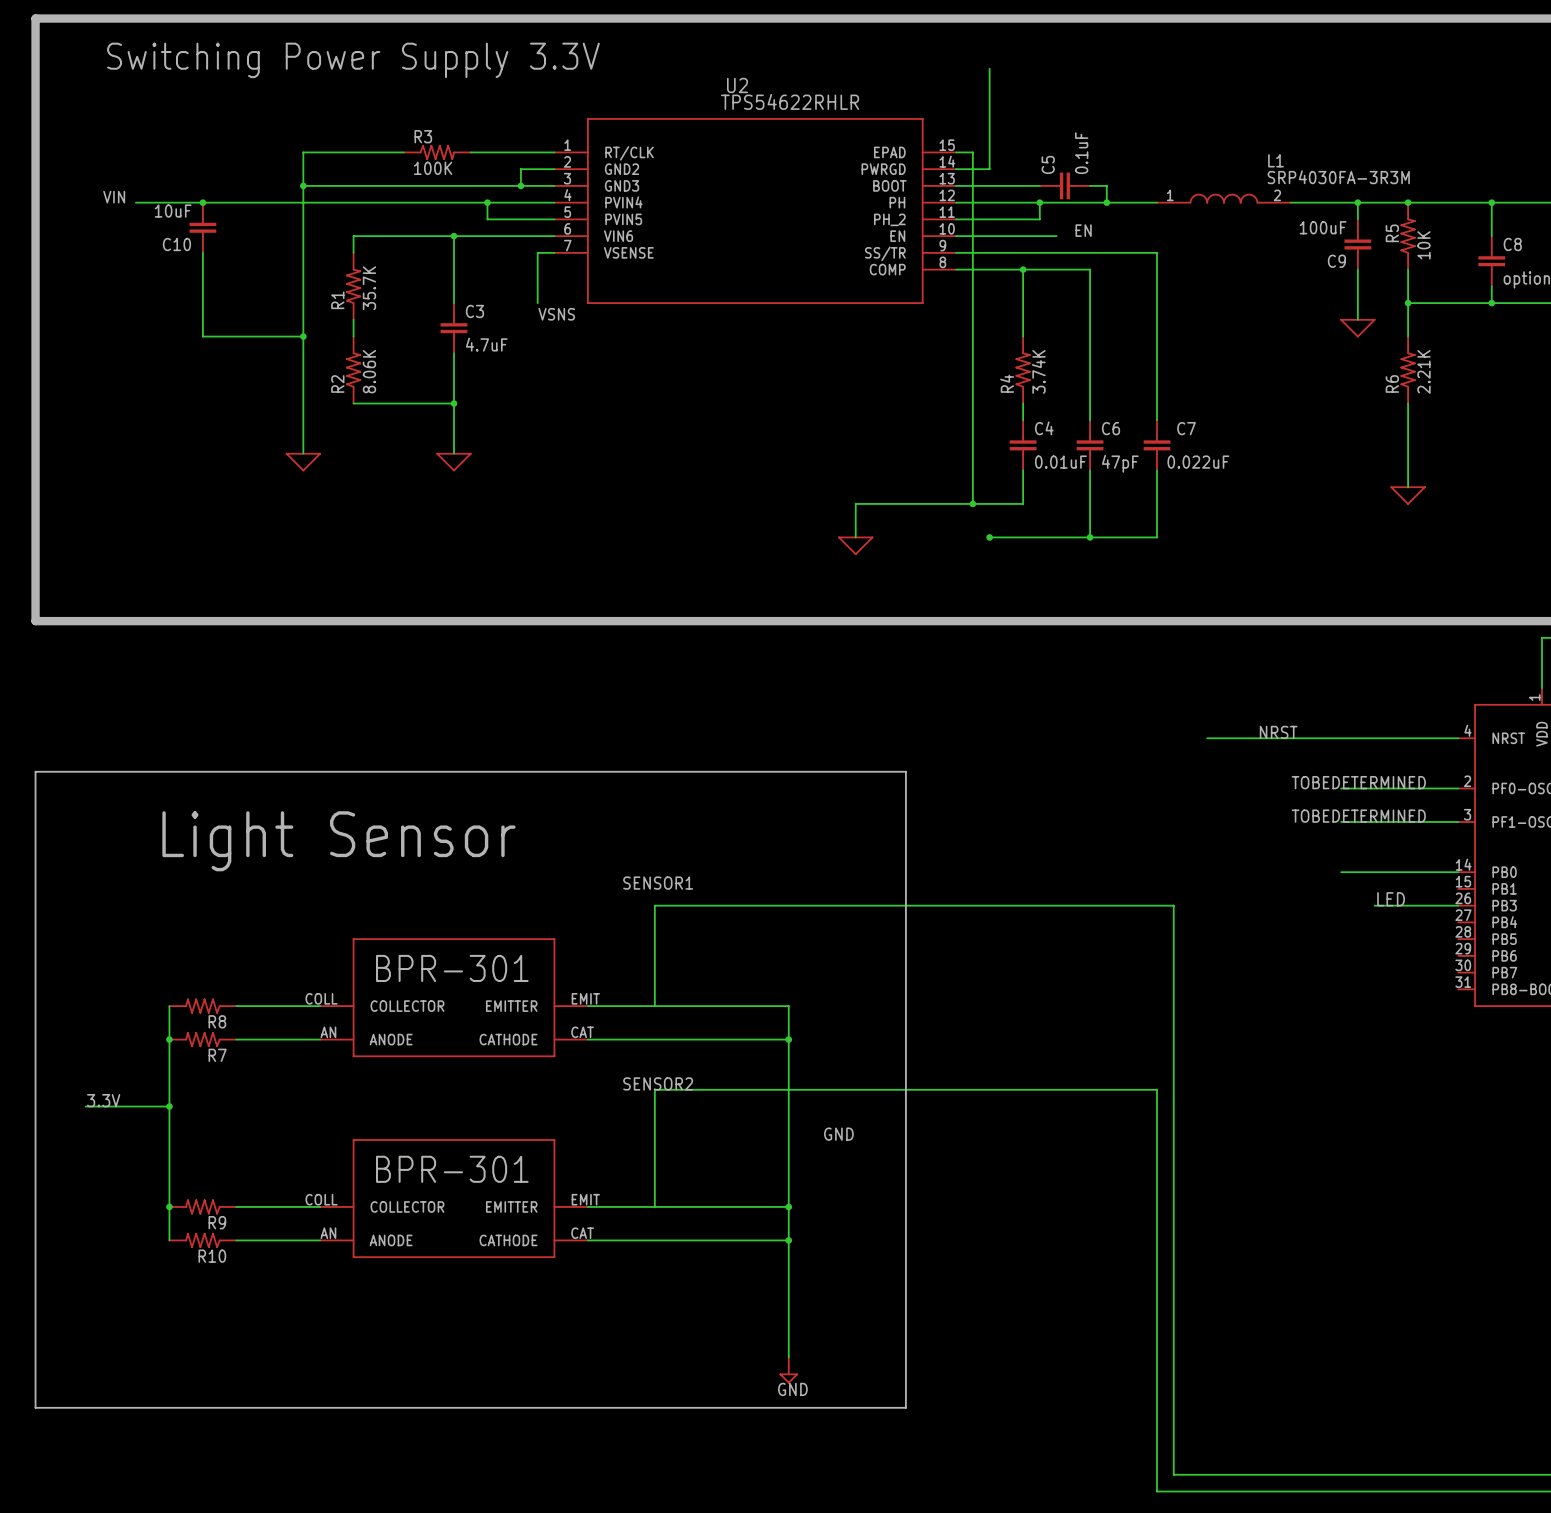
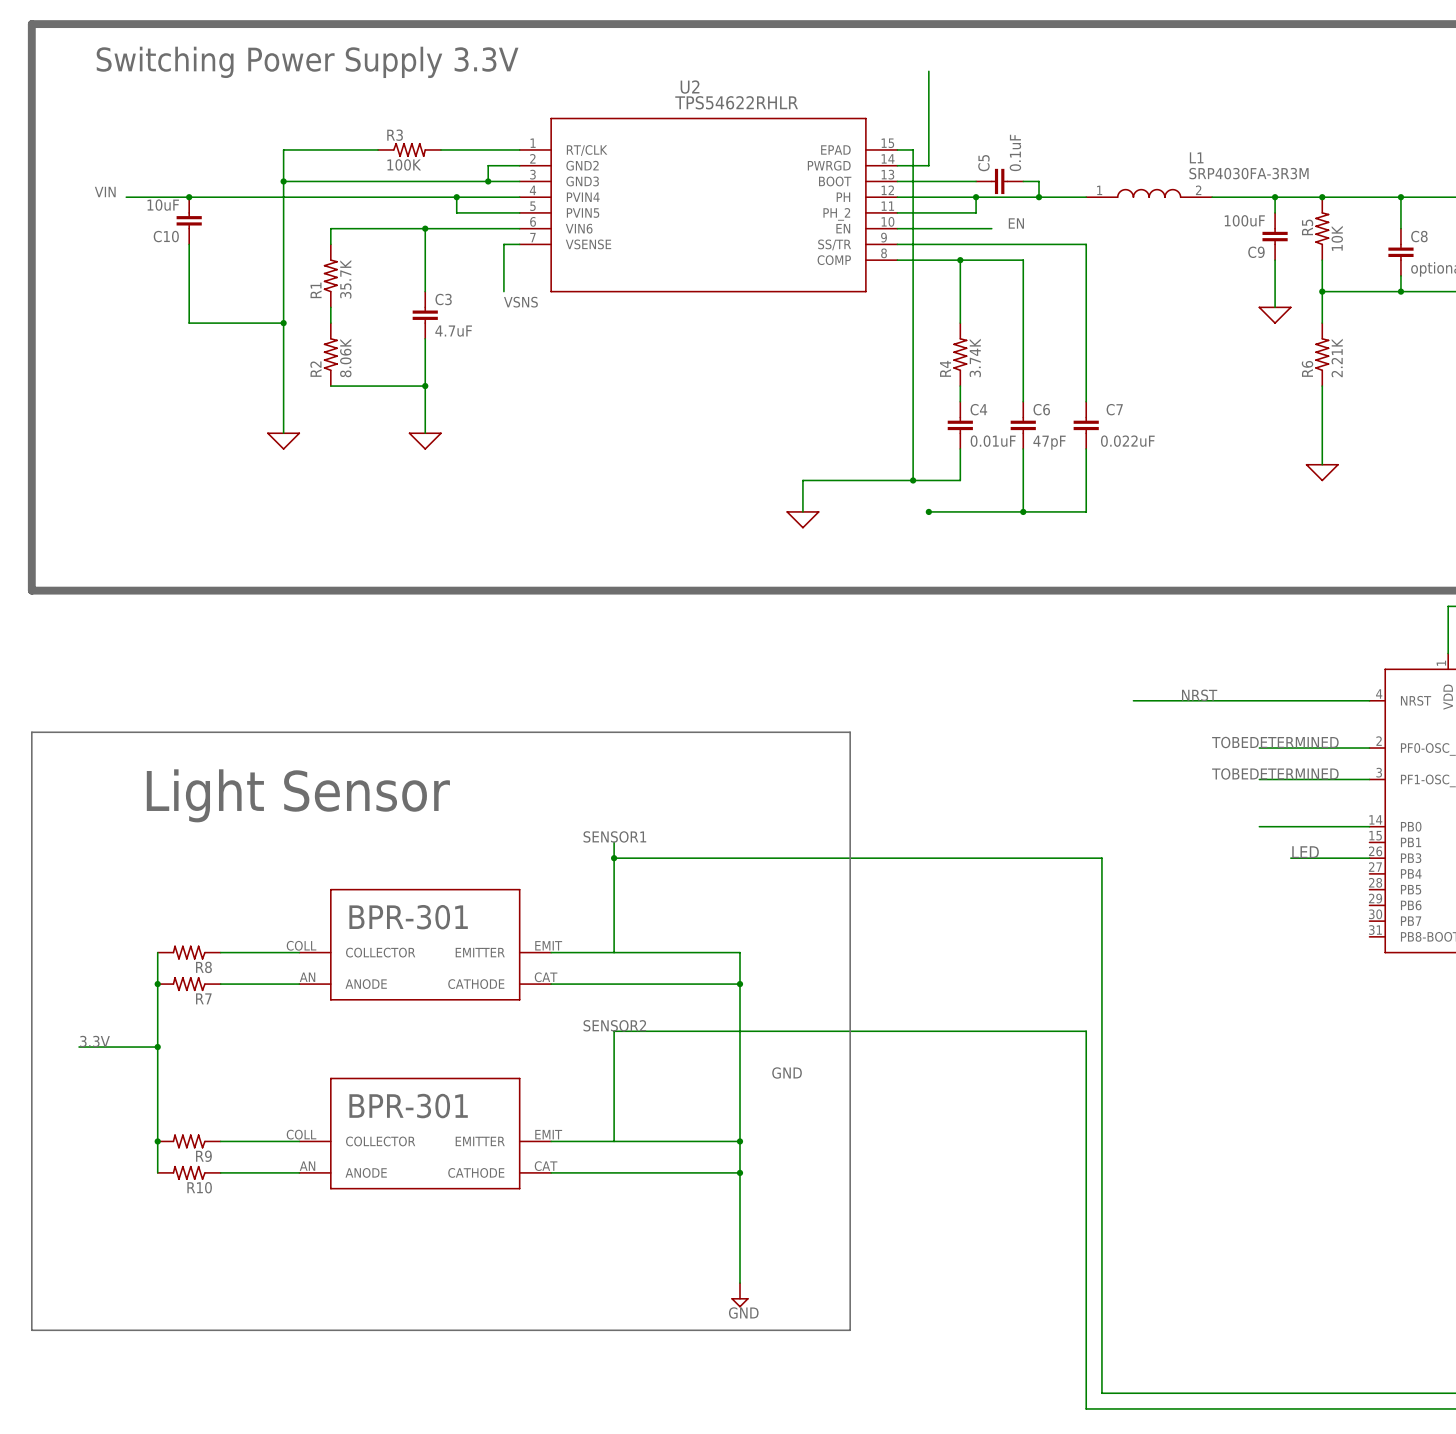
wire: none -> (614, 842) (614, 858)
junction: none -> (614, 858)

